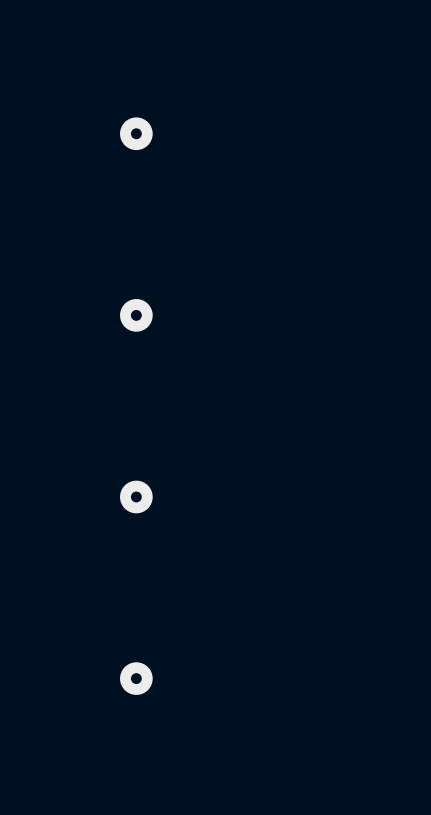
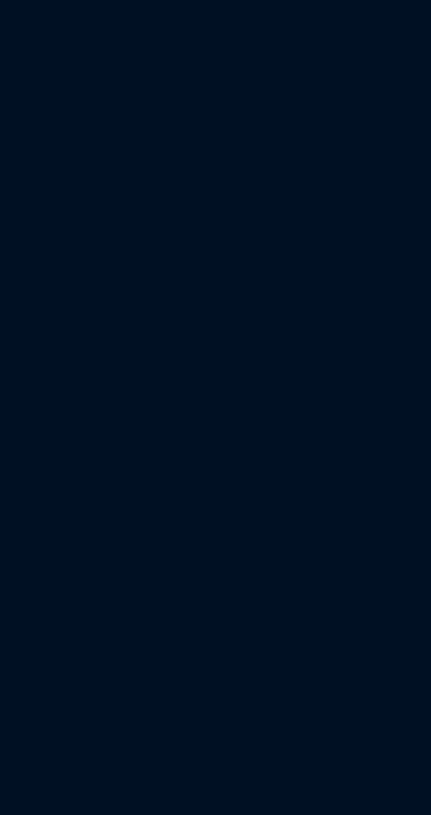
via: (136, 133) -> none
via: (136, 315) -> none
via: (136, 496) -> none
via: (136, 678) -> none

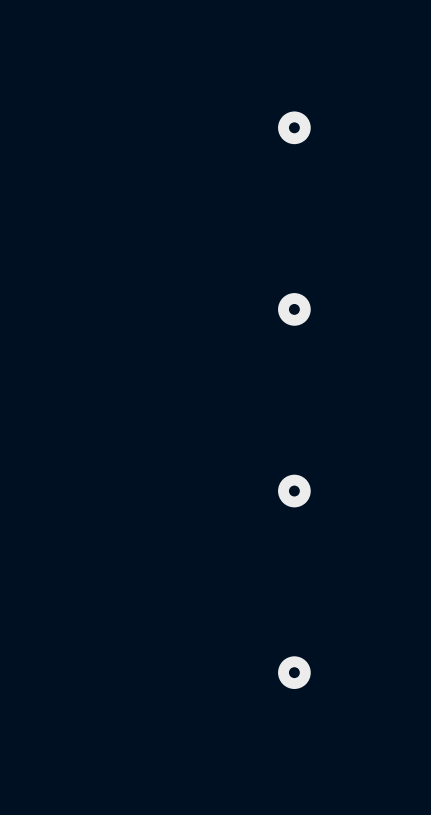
via: none -> (294, 127)
via: none -> (294, 309)
via: none -> (294, 491)
via: none -> (294, 672)

